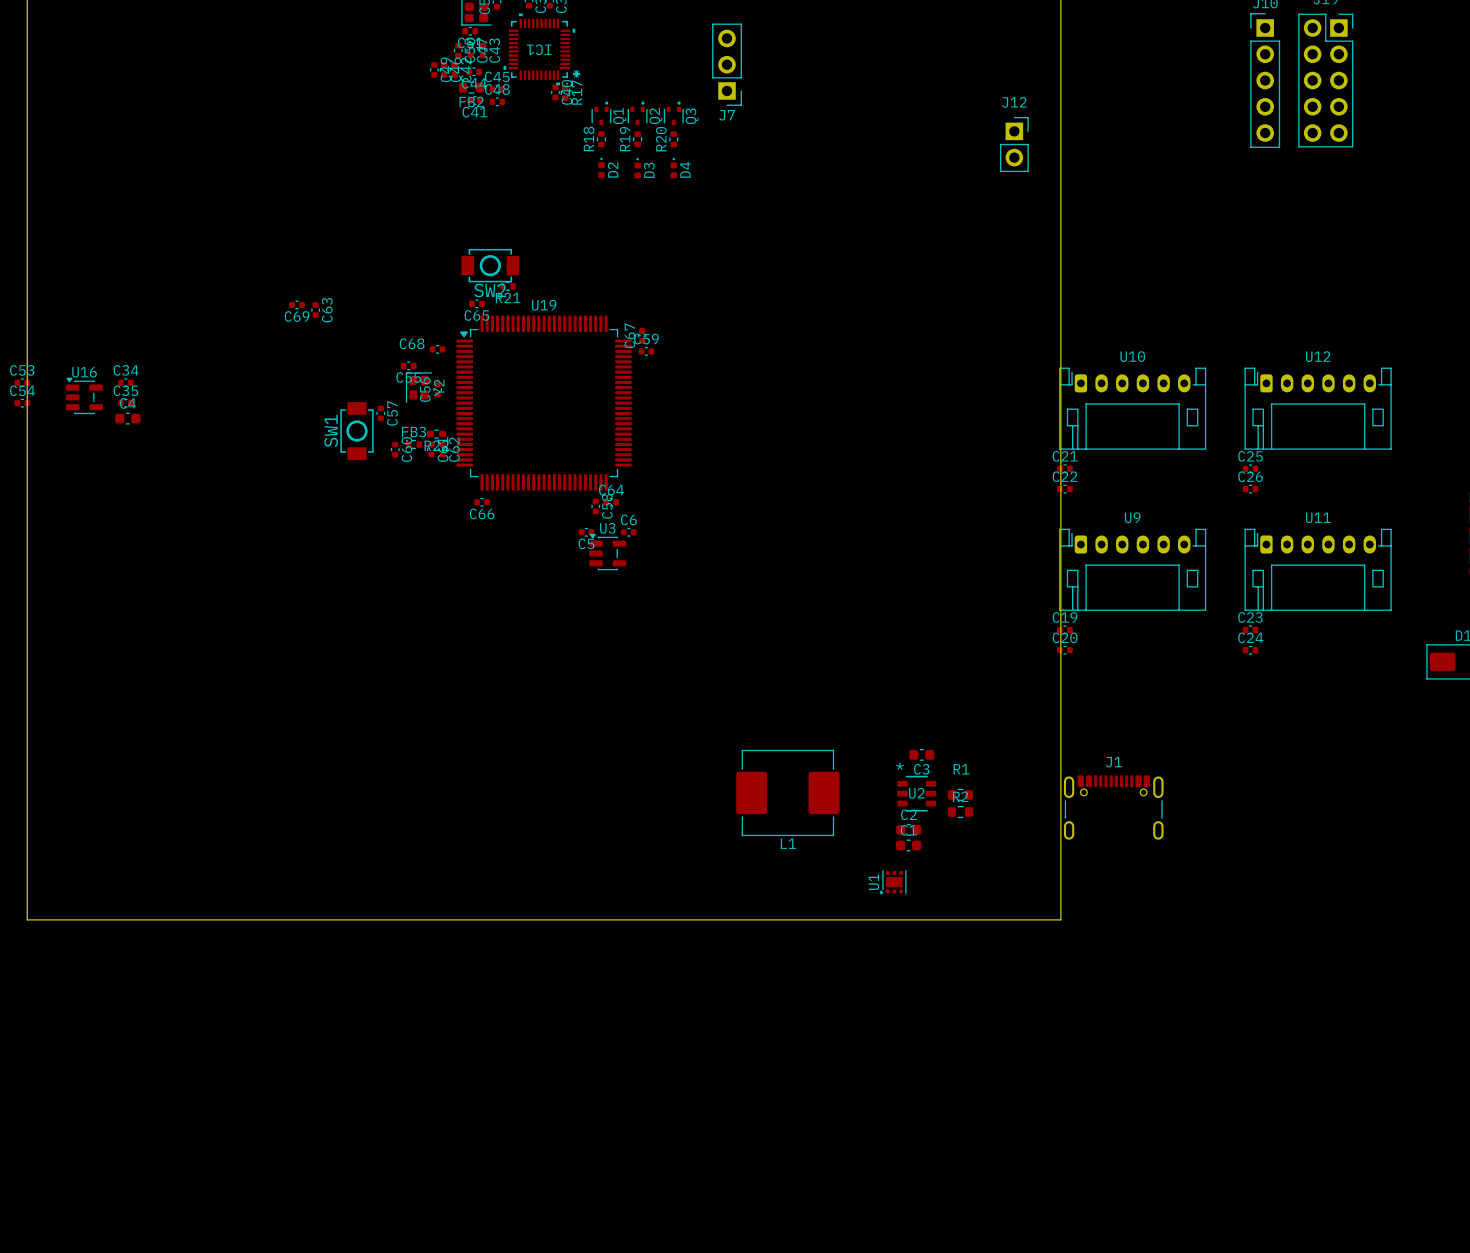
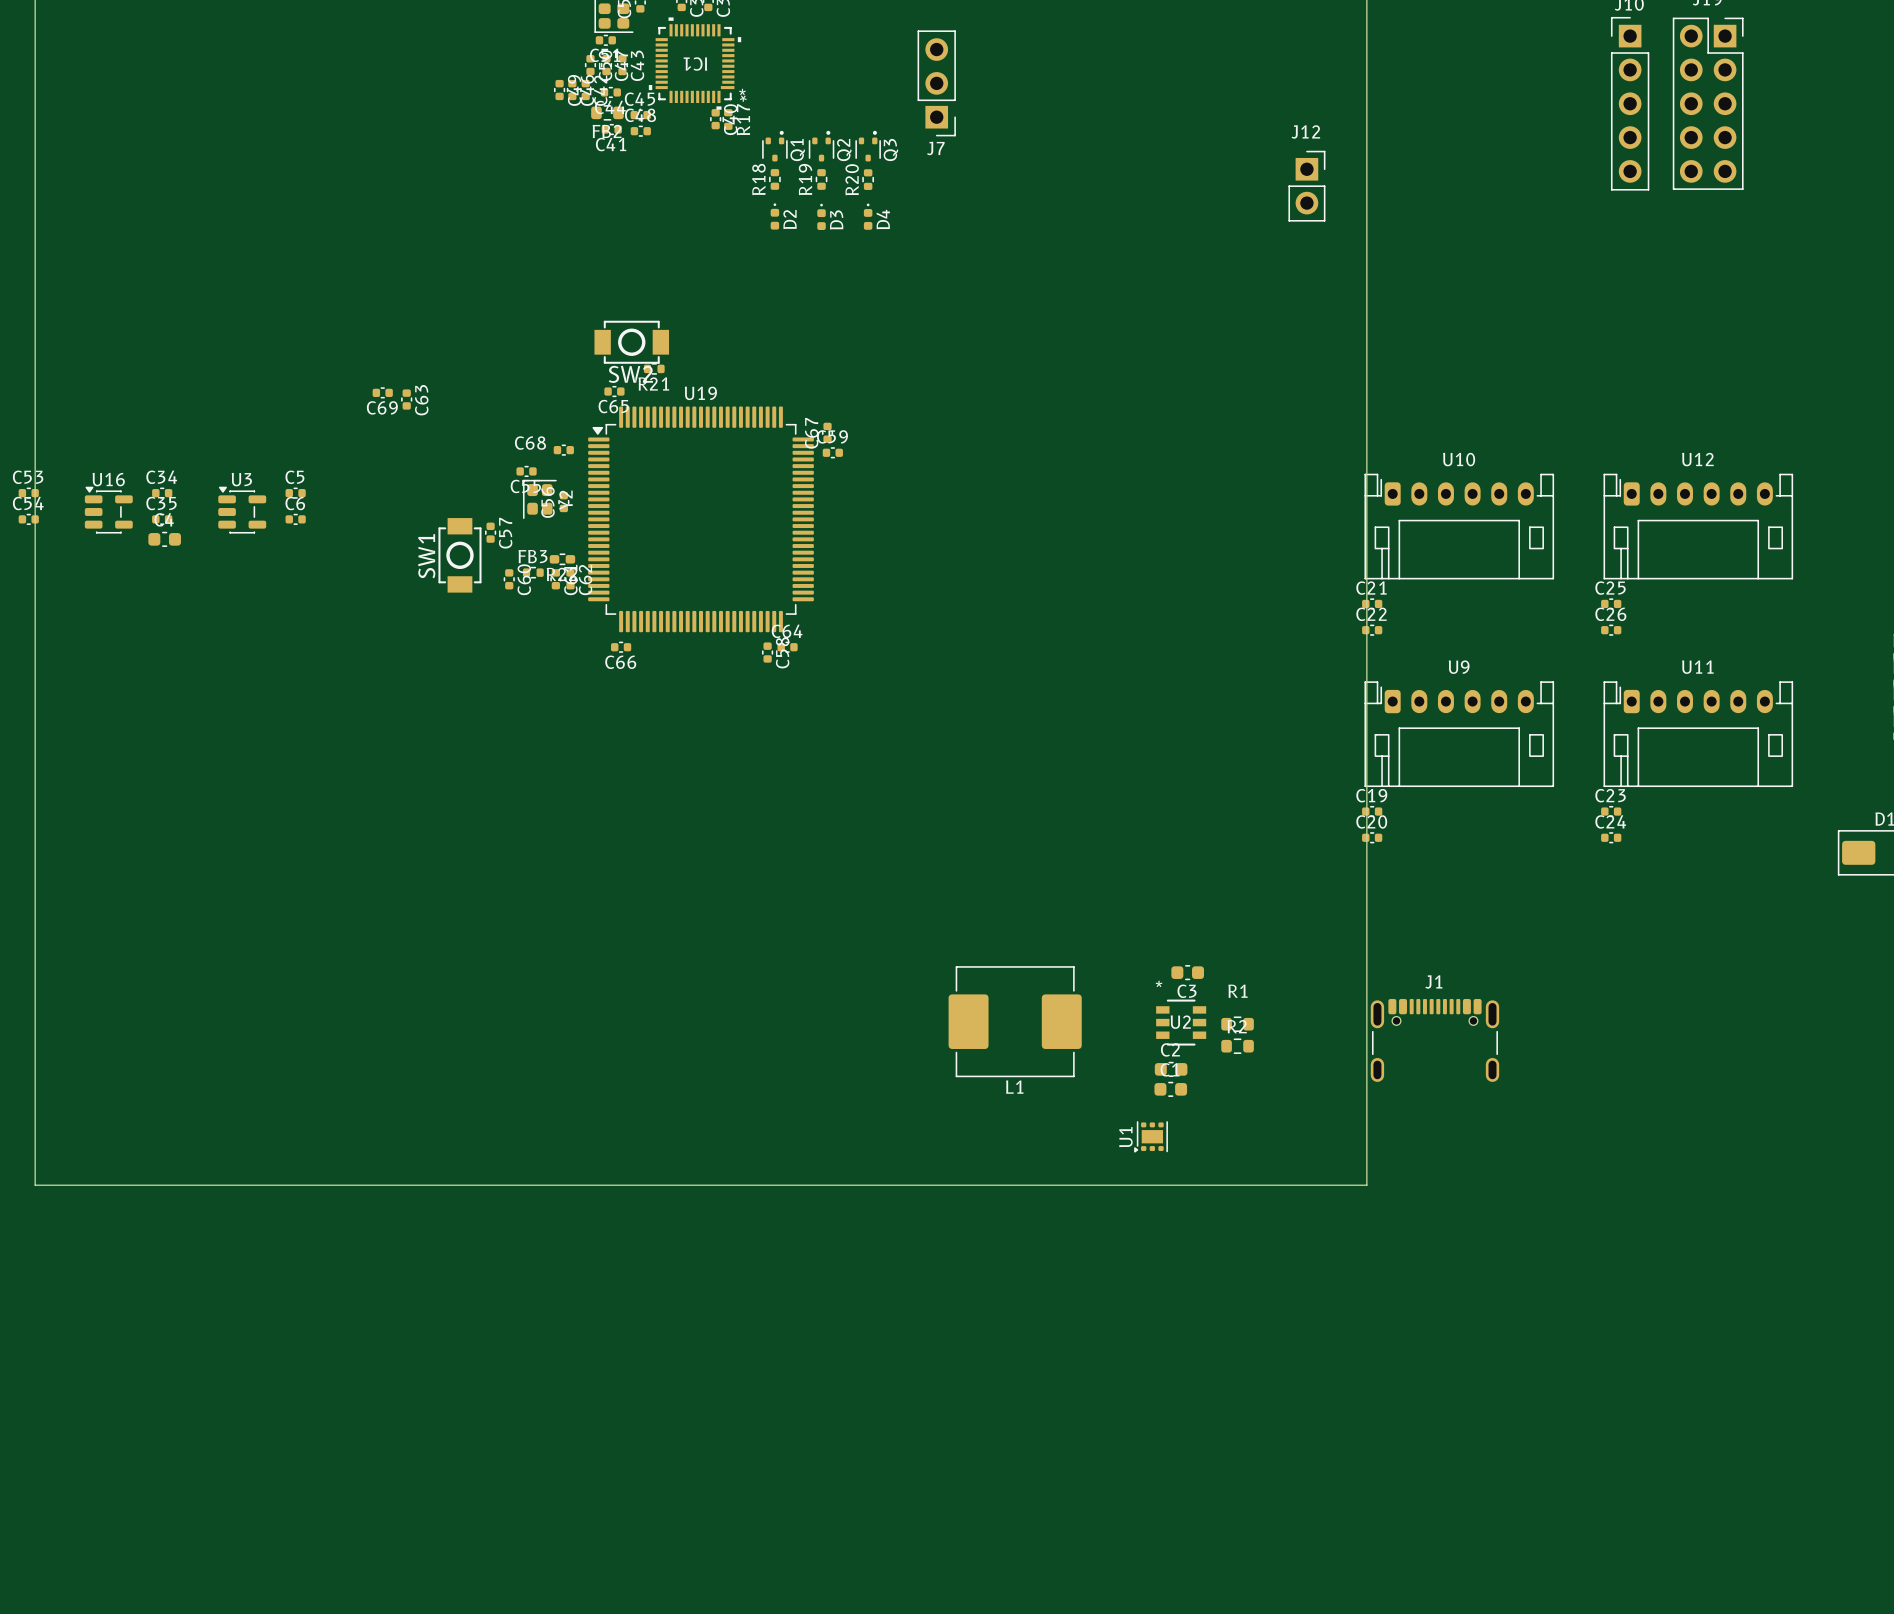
C5 position: (586, 532) -> (295, 493)
C6 position: (628, 532) -> (295, 519)
C5 name position: C5 (586, 543) -> C5 (294, 477)
U3 position: (607, 552) -> (242, 510)

